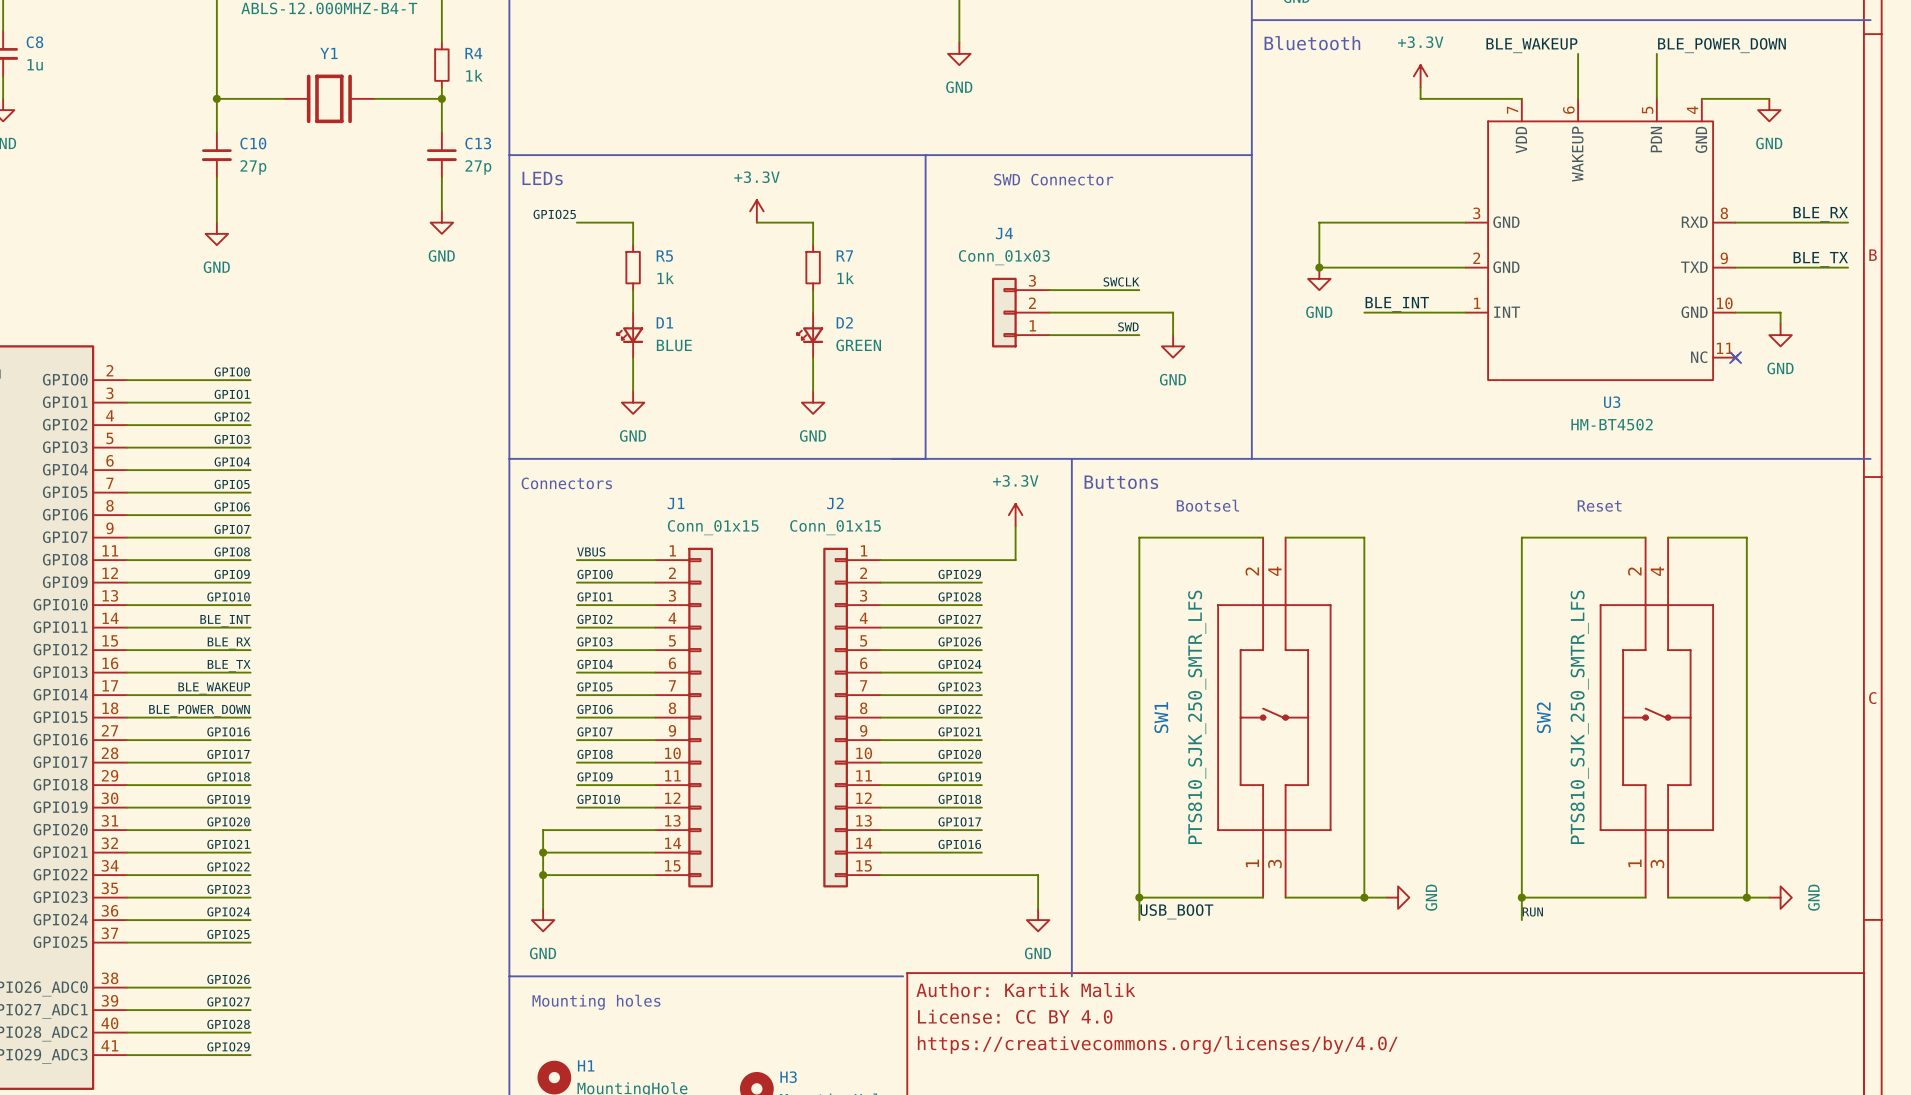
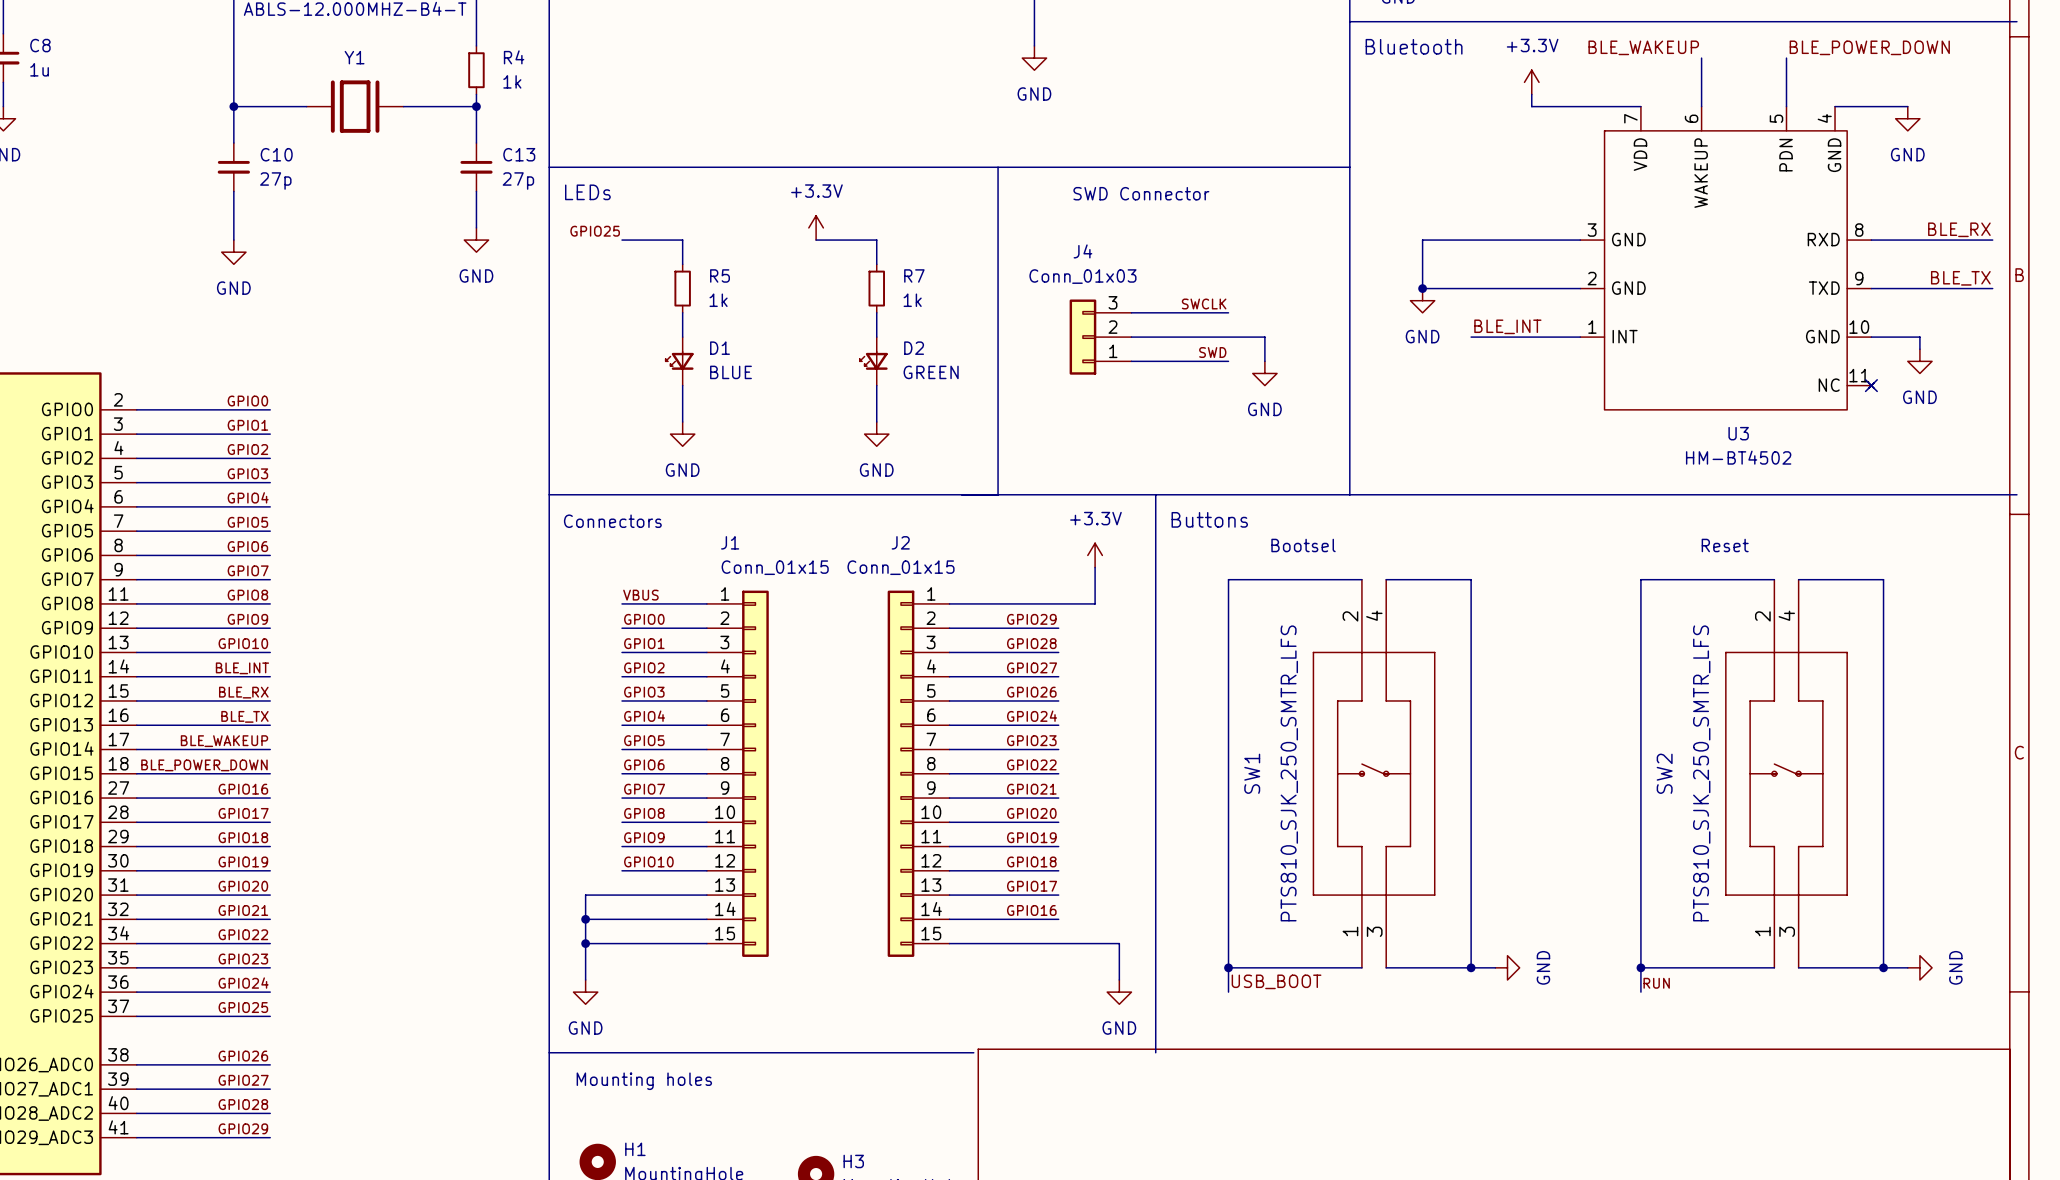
title block: Author: Kartik Malik (1025, 990) -> none
title block: License: CC BY 4.0 (1015, 1016) -> none
title block: https://creativecommons.org/licenses/by/4.0/ (1157, 1045) -> none

